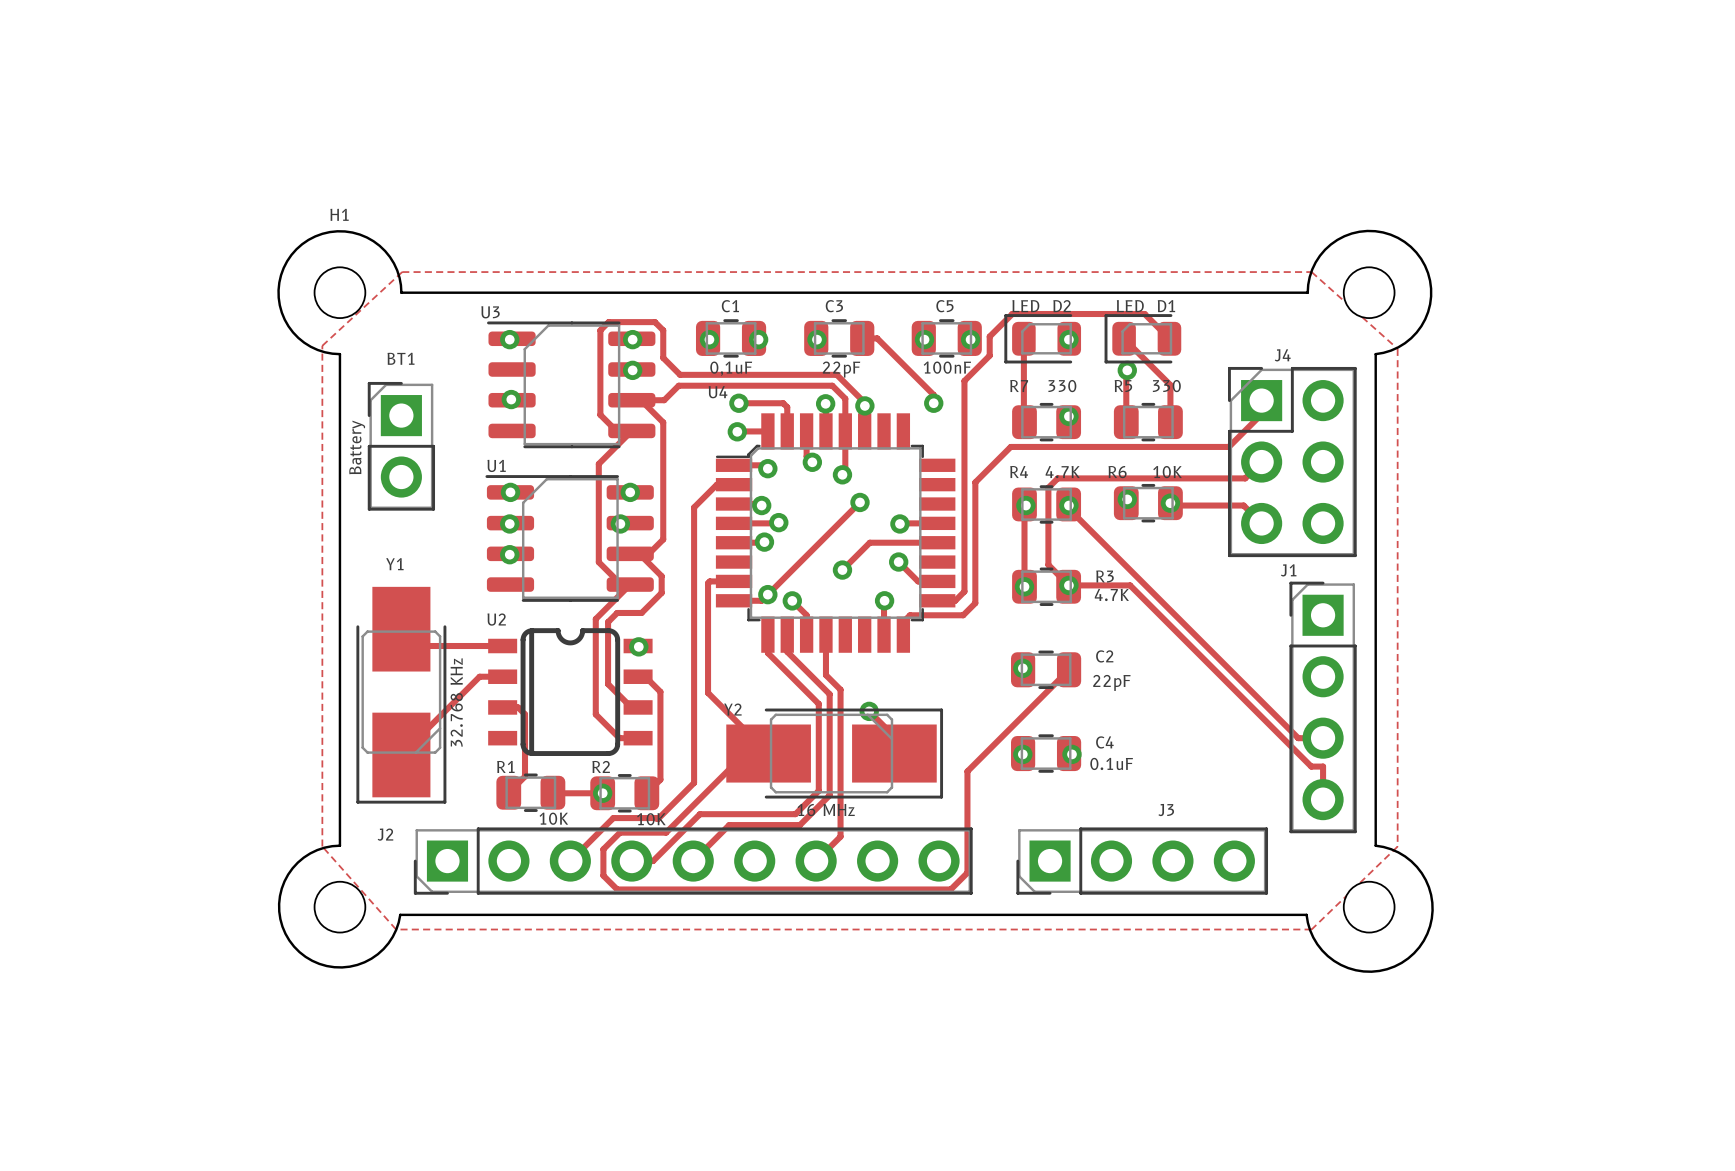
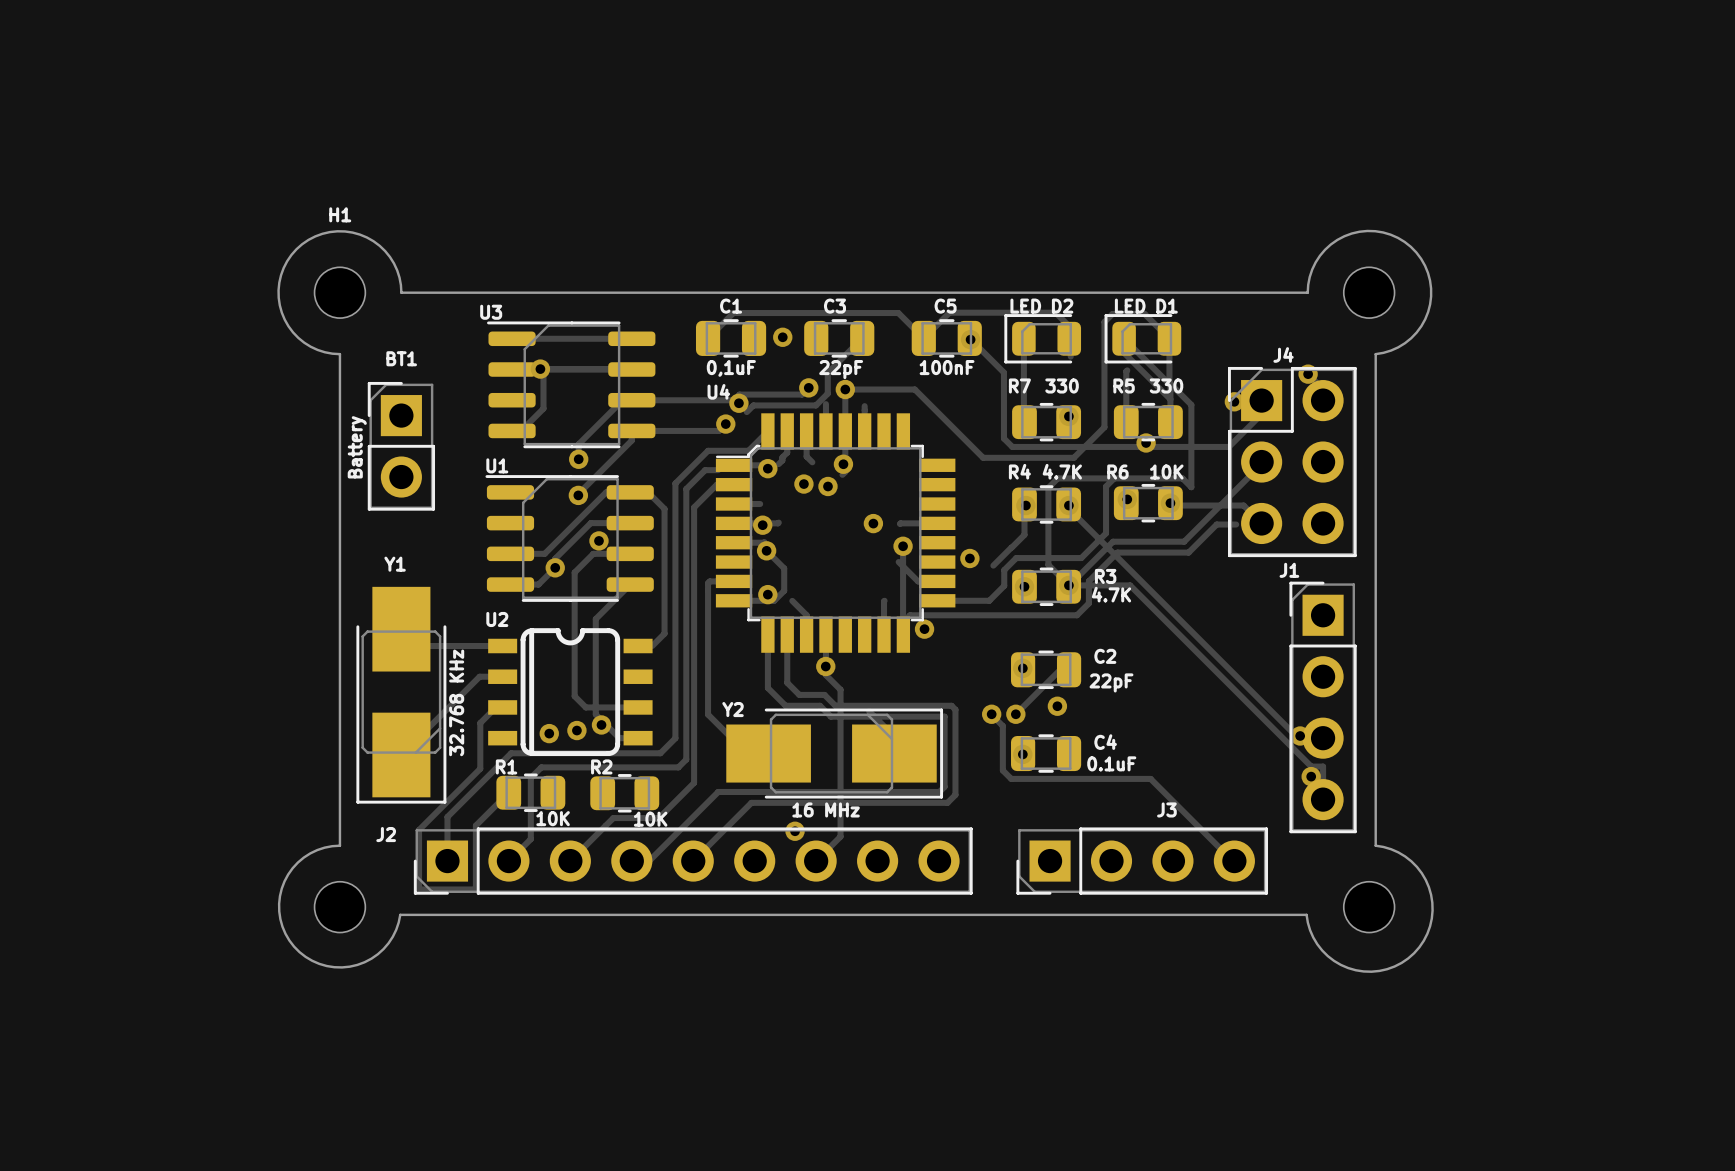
zone outline: (402, 272) (322, 345) (322, 846) (396, 929) (1311, 929) (1397, 846) (1397, 348) (1311, 272) (402, 272) -> none
track: (1112, 313) (1012, 313) (989, 336) (989, 355) (964, 380) (964, 591) (955, 600) -> (1114, 478) (1106, 486) (1106, 533) (1081, 558) (1016, 558) (1004, 570) (1004, 585) (989, 600) (955, 600)
track: none -> (1112, 313) (1104, 322) (1104, 427) (1073, 457) (983, 457) (914, 389) (845, 389) (845, 398)
via: none -> (782, 337)
track: none -> (512, 338) (631, 338)
track: none -> (708, 338) (733, 313) (898, 313) (923, 338) (949, 312) (1055, 312) (1070, 327) (1070, 356)
track: (862, 338) (877, 338) (933, 394) (933, 403) -> (862, 338) (827, 372) (827, 393) (815, 405) (753, 405) (746, 412)
track: none -> (969, 338) (1003, 372) (1003, 438) (1012, 446)
via: (509, 339) -> none
via: (632, 339) -> none
via: (709, 339) -> none
via: (758, 339) -> none
via: (816, 339) -> none
via: (924, 339) -> none
via: (1068, 339) -> none
track: none -> (1124, 352) (1170, 399)
track: none -> (512, 369) (540, 369) (631, 369) (540, 369) (543, 372) (543, 408) (521, 430) (512, 430)
via: none -> (540, 369)
via: (632, 370) -> none
via: (1127, 370) -> none
via: none -> (1308, 374)
via: none -> (845, 389)
track: (845, 398) (832, 385) (678, 385) (664, 400) (631, 400) -> (808, 387) (802, 394) (739, 394) (733, 400) (631, 400)
via: (511, 399) -> none
track: none -> (631, 400) (622, 400) (578, 444) (578, 459)
track: (641, 400) (663, 422) (663, 539) (648, 553) (630, 553) -> none
via: none -> (1234, 401)
track: (738, 403) (783, 403) (787, 407) (787, 431) -> (778, 464) (787, 452) (787, 431)
via position: (825, 403) -> (808, 387)
via: (933, 403) -> none
track: (864, 405) (864, 402) (836, 374) (680, 374) (663, 357) (663, 330) (654, 322) (608, 322) (600, 330) (600, 414) (616, 430) (631, 430) (598, 463) (598, 562) (621, 584) (630, 584) -> none
via: (864, 405) -> none
track: none -> (725, 424) (718, 430) (631, 430) (631, 440) (578, 495)
via position: (737, 431) -> (725, 424)
track: (767, 431) (737, 431) -> (767, 431) (748, 450) (708, 450) (675, 483) (675, 738) (660, 753) (511, 753) (447, 816) (447, 861)
via: none -> (1146, 442)
track: (1012, 446) (975, 482) (975, 603) (963, 615) -> (1236, 524) (1216, 524) (1188, 552) (1117, 552) (1088, 581) (1088, 603) (1077, 615) (963, 615)
track: none -> (1267, 457) (1184, 541) (1113, 541) (1079, 575) (1069, 575) (1068, 586)
via: none -> (578, 459)
via: (812, 462) -> none
track: (1261, 462) (1245, 478) (1182, 478) -> (1169, 338) (1169, 382) (1191, 404) (1191, 487) (1182, 478)
via: none -> (843, 464)
track: none -> (718, 470) (705, 470) (686, 489) (686, 759) (678, 767) (541, 767) (530, 777) (530, 839) (508, 861)
via: (842, 474) -> none
via: none -> (803, 484)
via: none -> (827, 486)
via: (510, 492) -> none
via: (630, 492) -> none
via: none -> (578, 495)
track: (860, 502) (761, 600) -> (766, 550) (784, 568) (784, 590) (774, 600) (761, 600)
via: (860, 502) -> none
via: (761, 505) -> none
via: (778, 522) -> none
via: (509, 523) -> none
via: (620, 523) -> none
track: none -> (630, 523) (590, 523) (555, 558) (555, 567) (538, 584) (510, 584)
via: none -> (873, 523)
via: (899, 523) -> none
via: none -> (762, 525)
track: (1024, 534) (1024, 586) -> (1024, 534) (1011, 547)
via: none -> (598, 540)
via: (764, 542) -> none
track: (937, 542) (869, 542) (842, 570) -> none
track: none -> (903, 546) (903, 617)
track: none -> (1011, 547) (993, 565)
via: none -> (766, 550)
track: none -> (510, 553) (544, 553) (606, 492) (648, 492) (664, 508) (664, 633) (652, 646)
track: (639, 553) (661, 576) (661, 592) (641, 612) (617, 612) (608, 622) (608, 684) (631, 707) -> (630, 553) (593, 553) (574, 572) (574, 696) (585, 707) (631, 707)
via: (509, 554) -> none
via: none -> (969, 558)
via position: (898, 562) -> (903, 546)
via: none -> (555, 567)
via: (842, 570) -> none
via: (792, 600) -> none
via: (884, 600) -> none
via: none -> (924, 629)
via: (638, 646) -> none
track: (787, 651) (829, 694) (829, 795) (799, 825) (729, 825) -> (787, 651) (787, 682) (799, 694) (824, 694) (835, 705) (951, 705) (955, 709) (955, 794) (947, 802) (751, 802) (729, 825)
track: (767, 653) (818, 703) (818, 790) (795, 814) (699, 814) (653, 861) (649, 861) -> (767, 653) (767, 688) (785, 705) (820, 705) (830, 716) (944, 716) (944, 786) (939, 791) (718, 791) (649, 861)
via: none -> (825, 666)
track: (1069, 669) (967, 771) (967, 872) (950, 889) (617, 889) (603, 875) (603, 849) (620, 832) (666, 832) (747, 753) -> (1069, 669) (1060, 669) (1015, 714)
track: (638, 676) (645, 676) (660, 691) (660, 779) (646, 793) -> none
track: (708, 692) (768, 753) -> (708, 692) (708, 714) (747, 753)
via: none -> (1057, 706)
track: (502, 707) (518, 707) (525, 714) (525, 776) (508, 792) -> (502, 707) (495, 707) (480, 723) (480, 768) (419, 830) (419, 889) (475, 889) (475, 825) (508, 792)
via: (869, 711) -> none
track: none -> (991, 714) (1002, 726) (1002, 770) (1011, 778) (1150, 778) (1232, 861)
via: none -> (991, 714)
via: none -> (1015, 714)
via: none -> (601, 724)
via: none -> (576, 730)
via: none -> (549, 733)
via: none -> (1300, 735)
via: (1071, 754) -> none
via: none -> (1311, 776)
track: (552, 792) (602, 793) -> none
via: (602, 793) -> none
via: none -> (795, 831)

